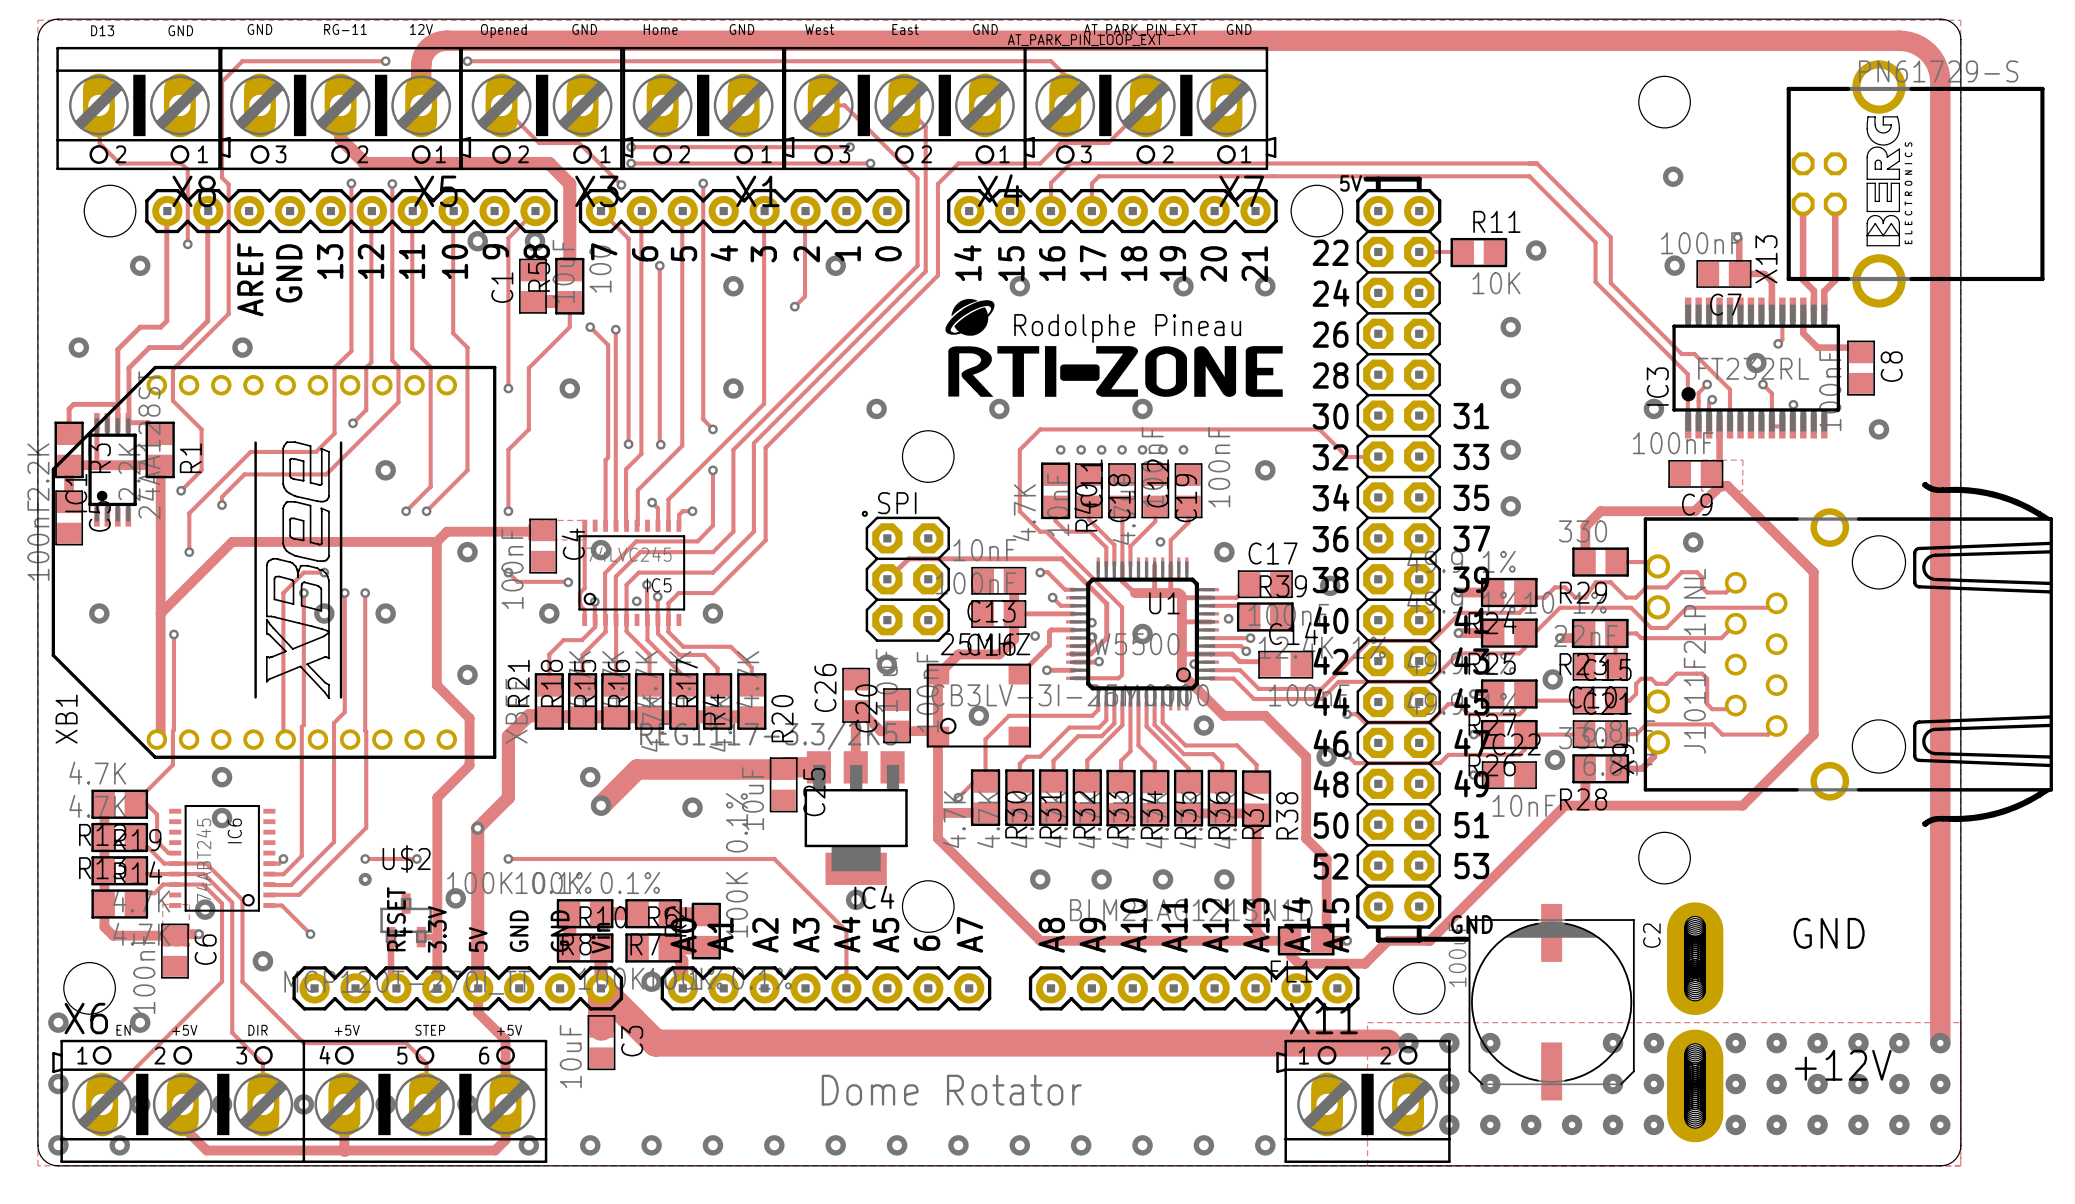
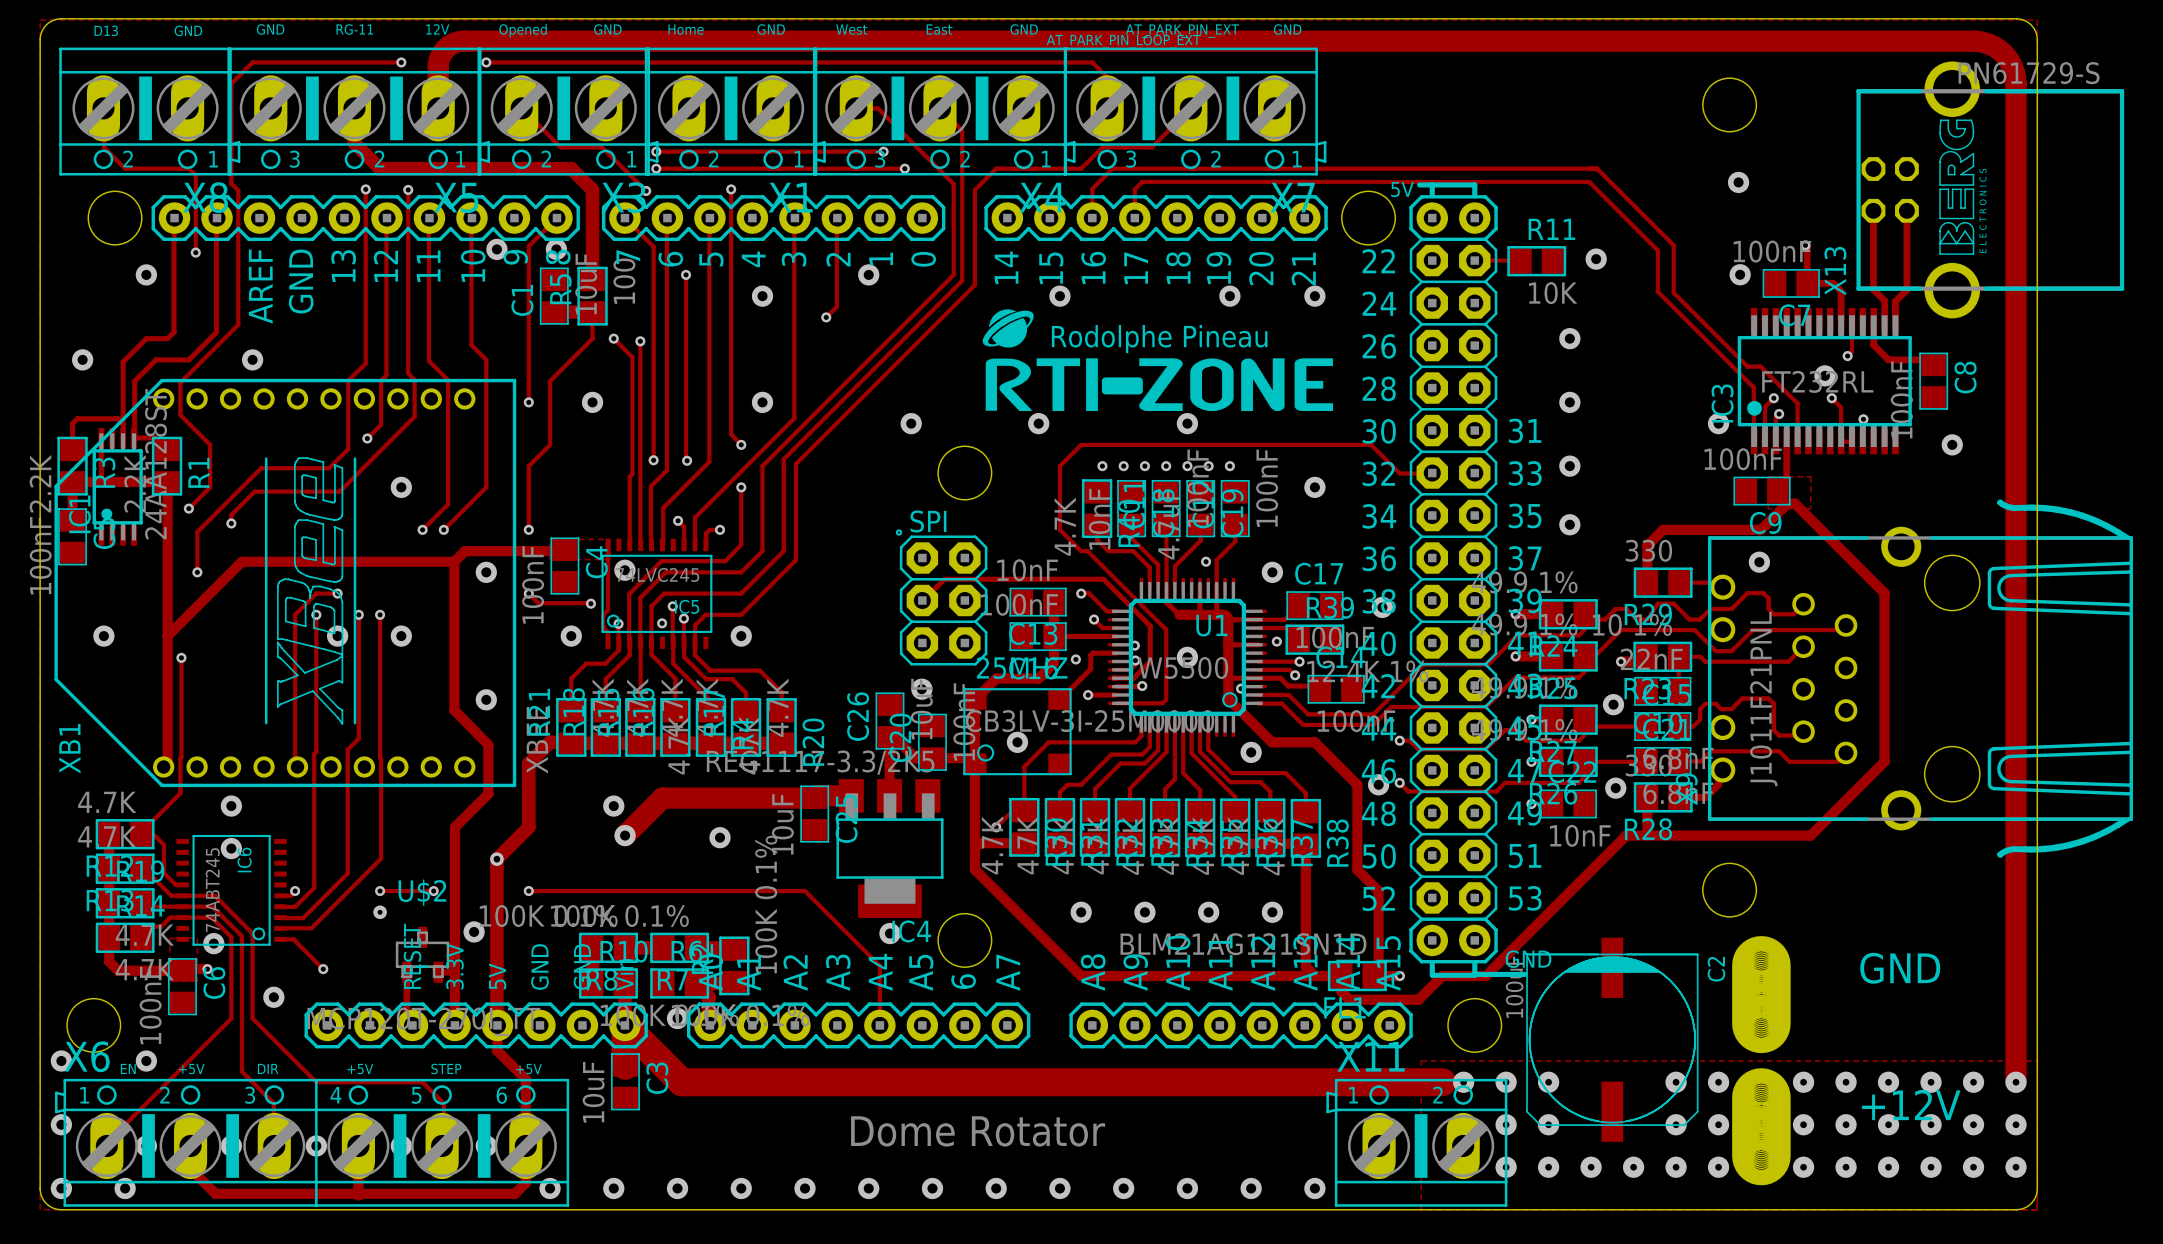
C2 footprint: [1468, 903, 1635, 1101] -> [1526, 937, 1699, 1142]

